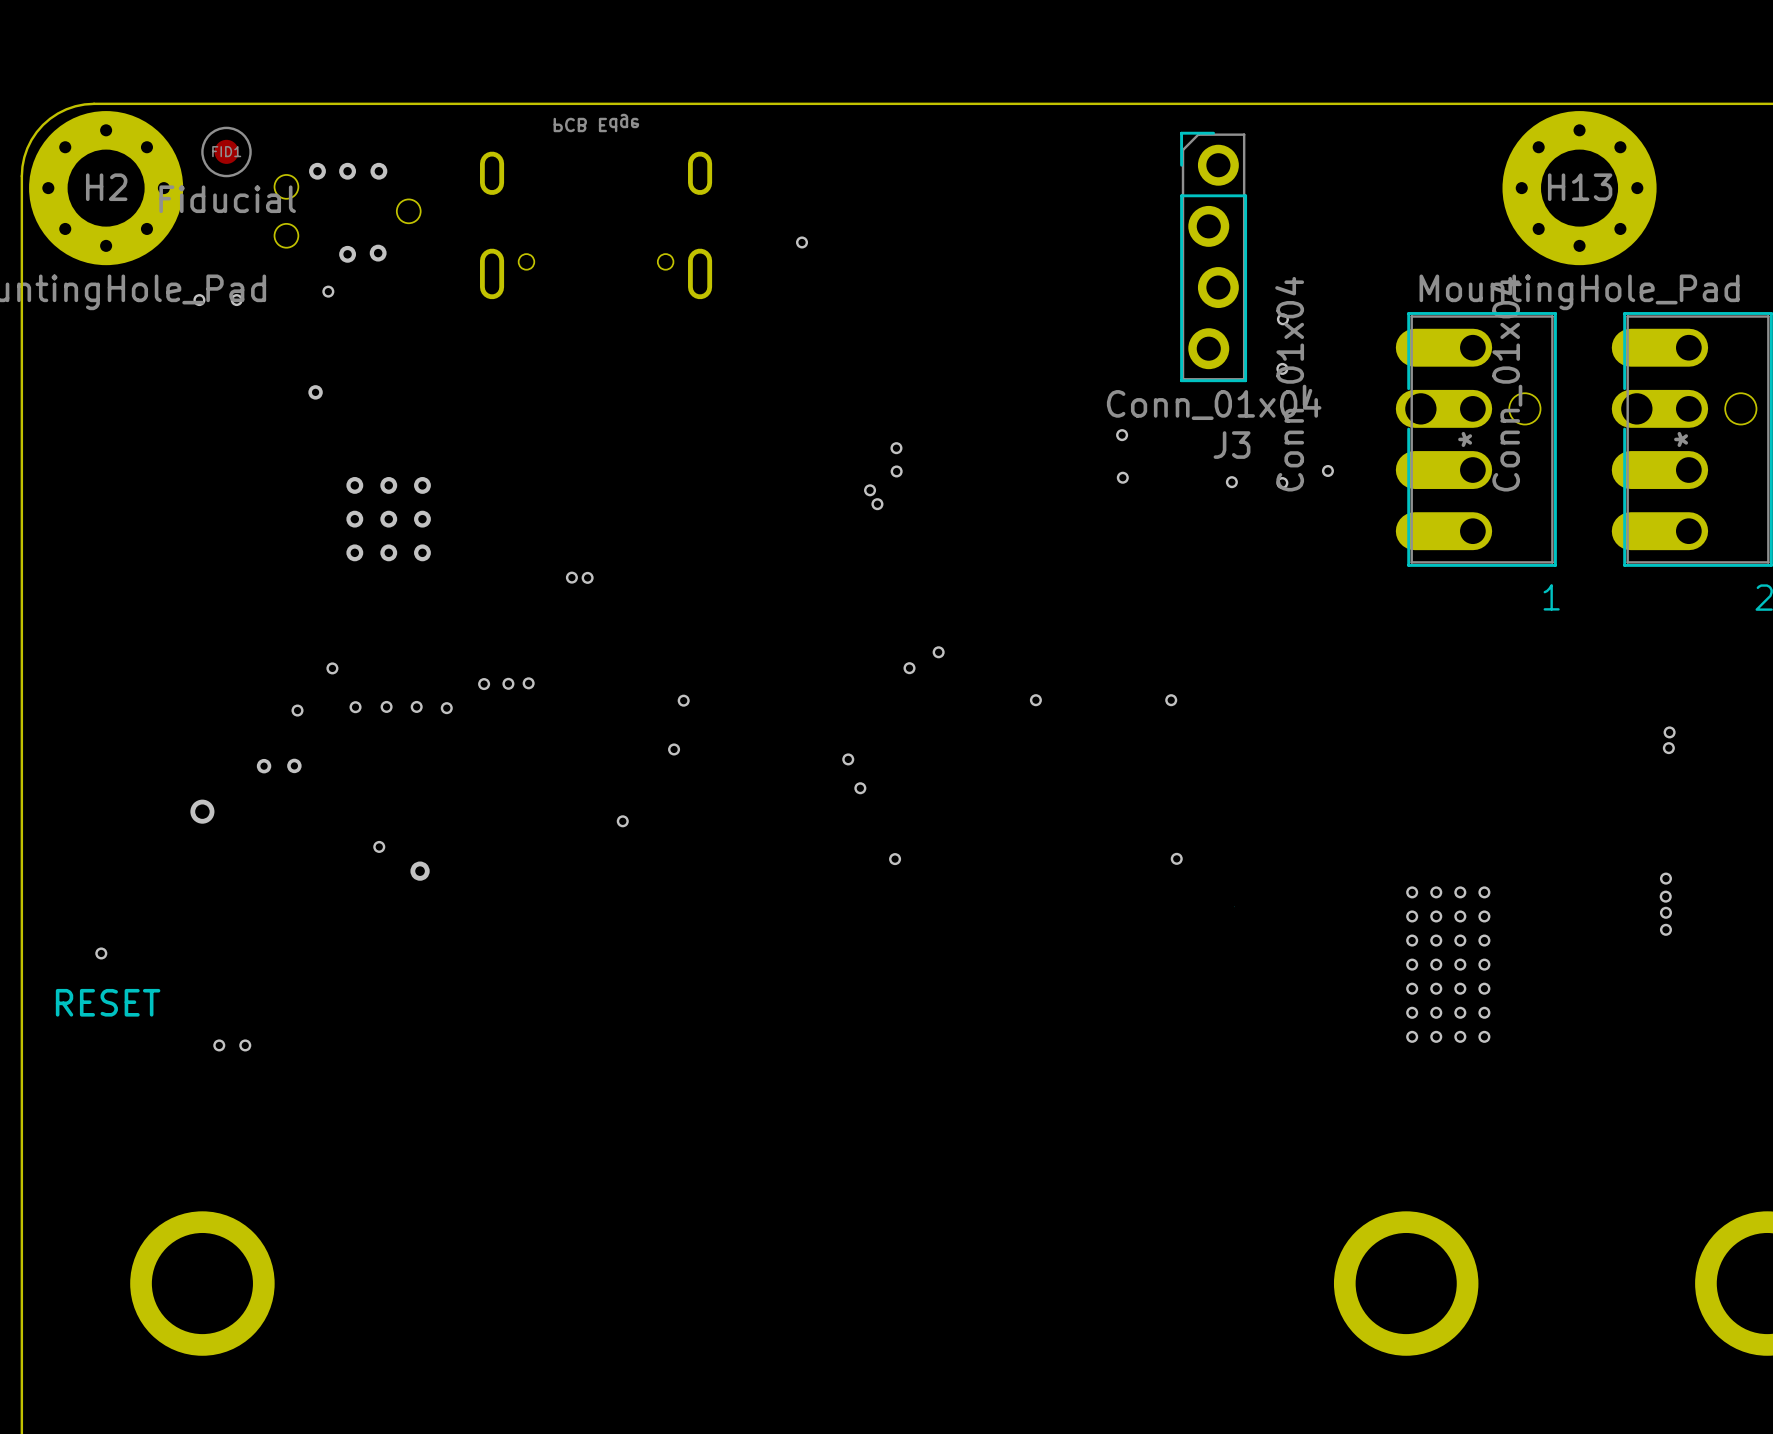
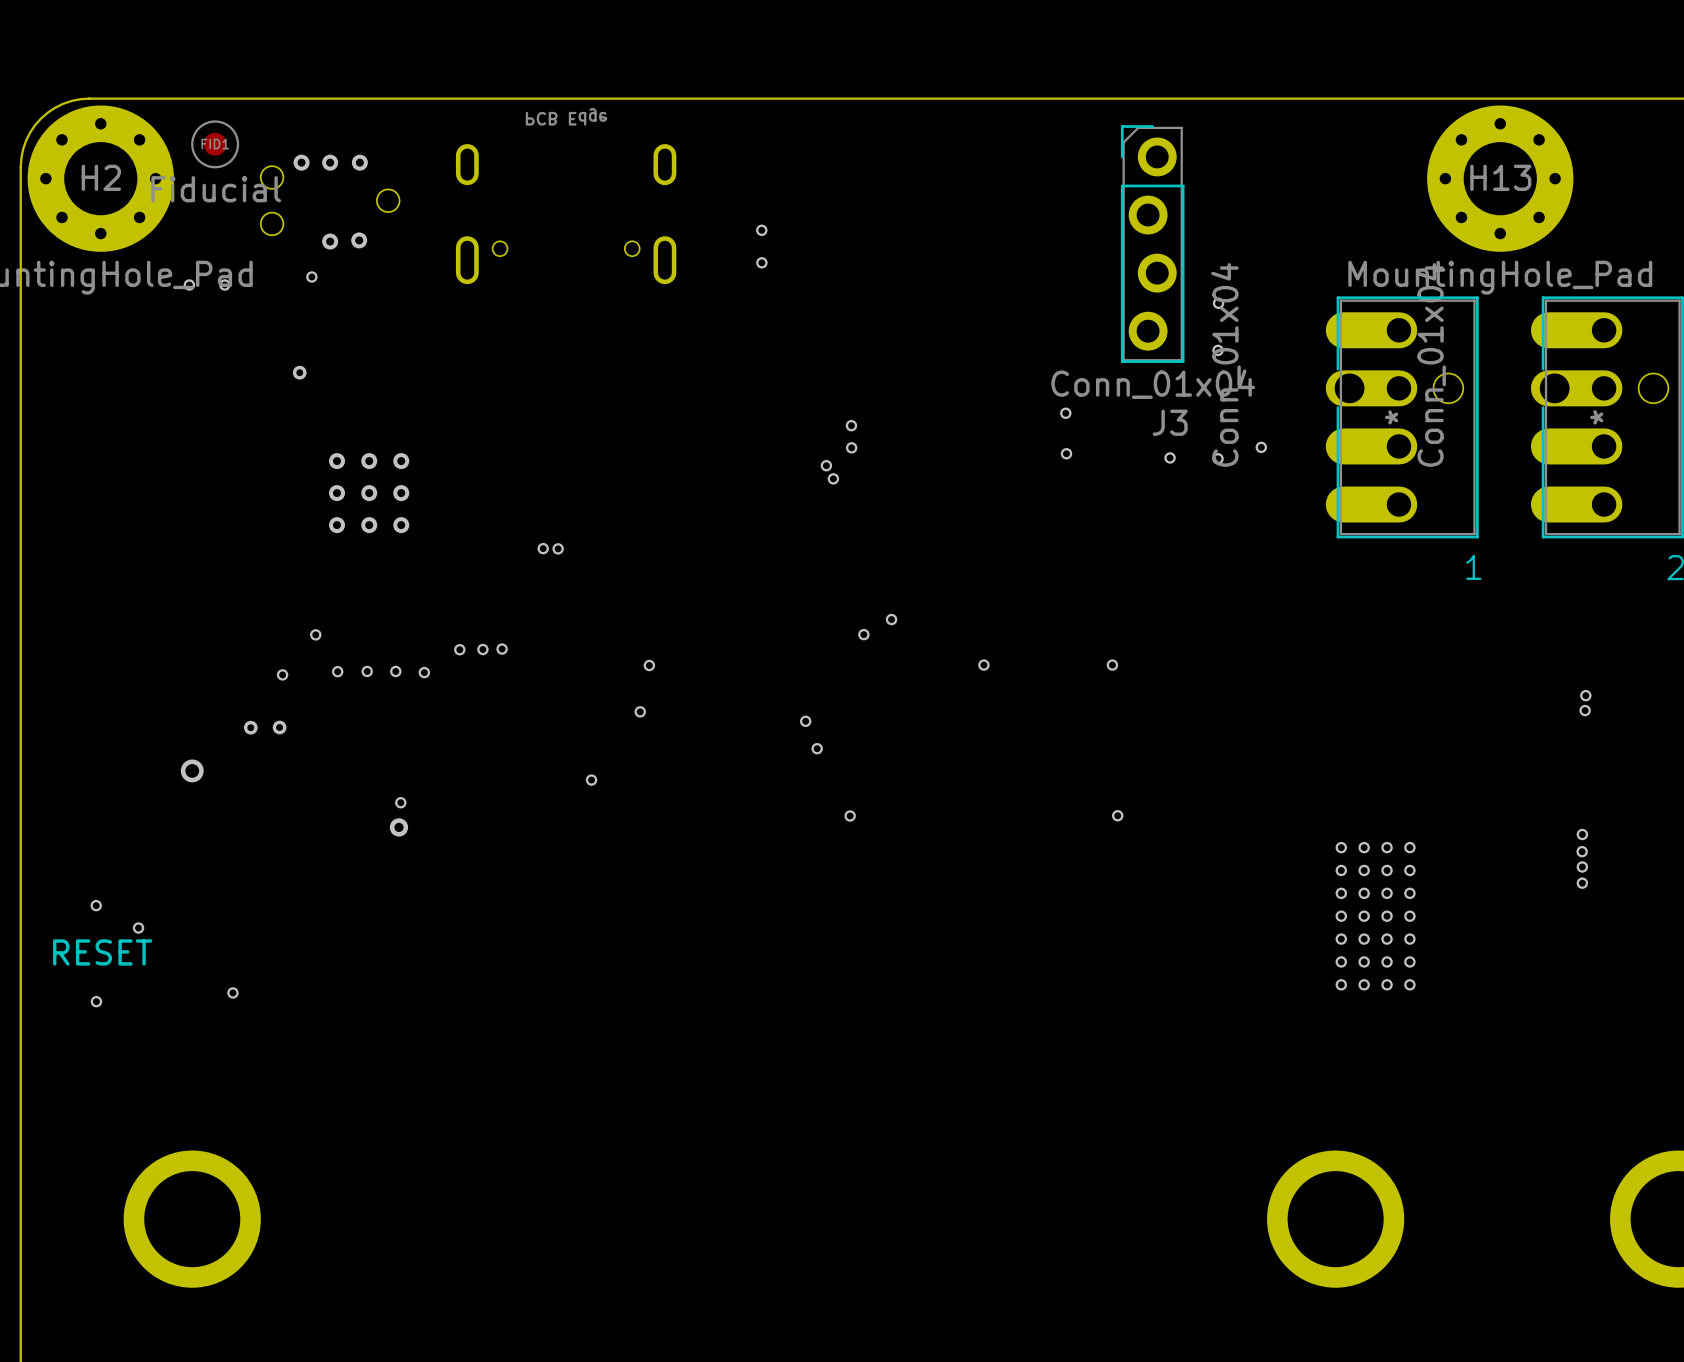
via: none -> (761, 262)
via position: (379, 846) -> (400, 802)
via: none -> (138, 928)
via: (219, 1045) -> none
via: none -> (96, 1001)

